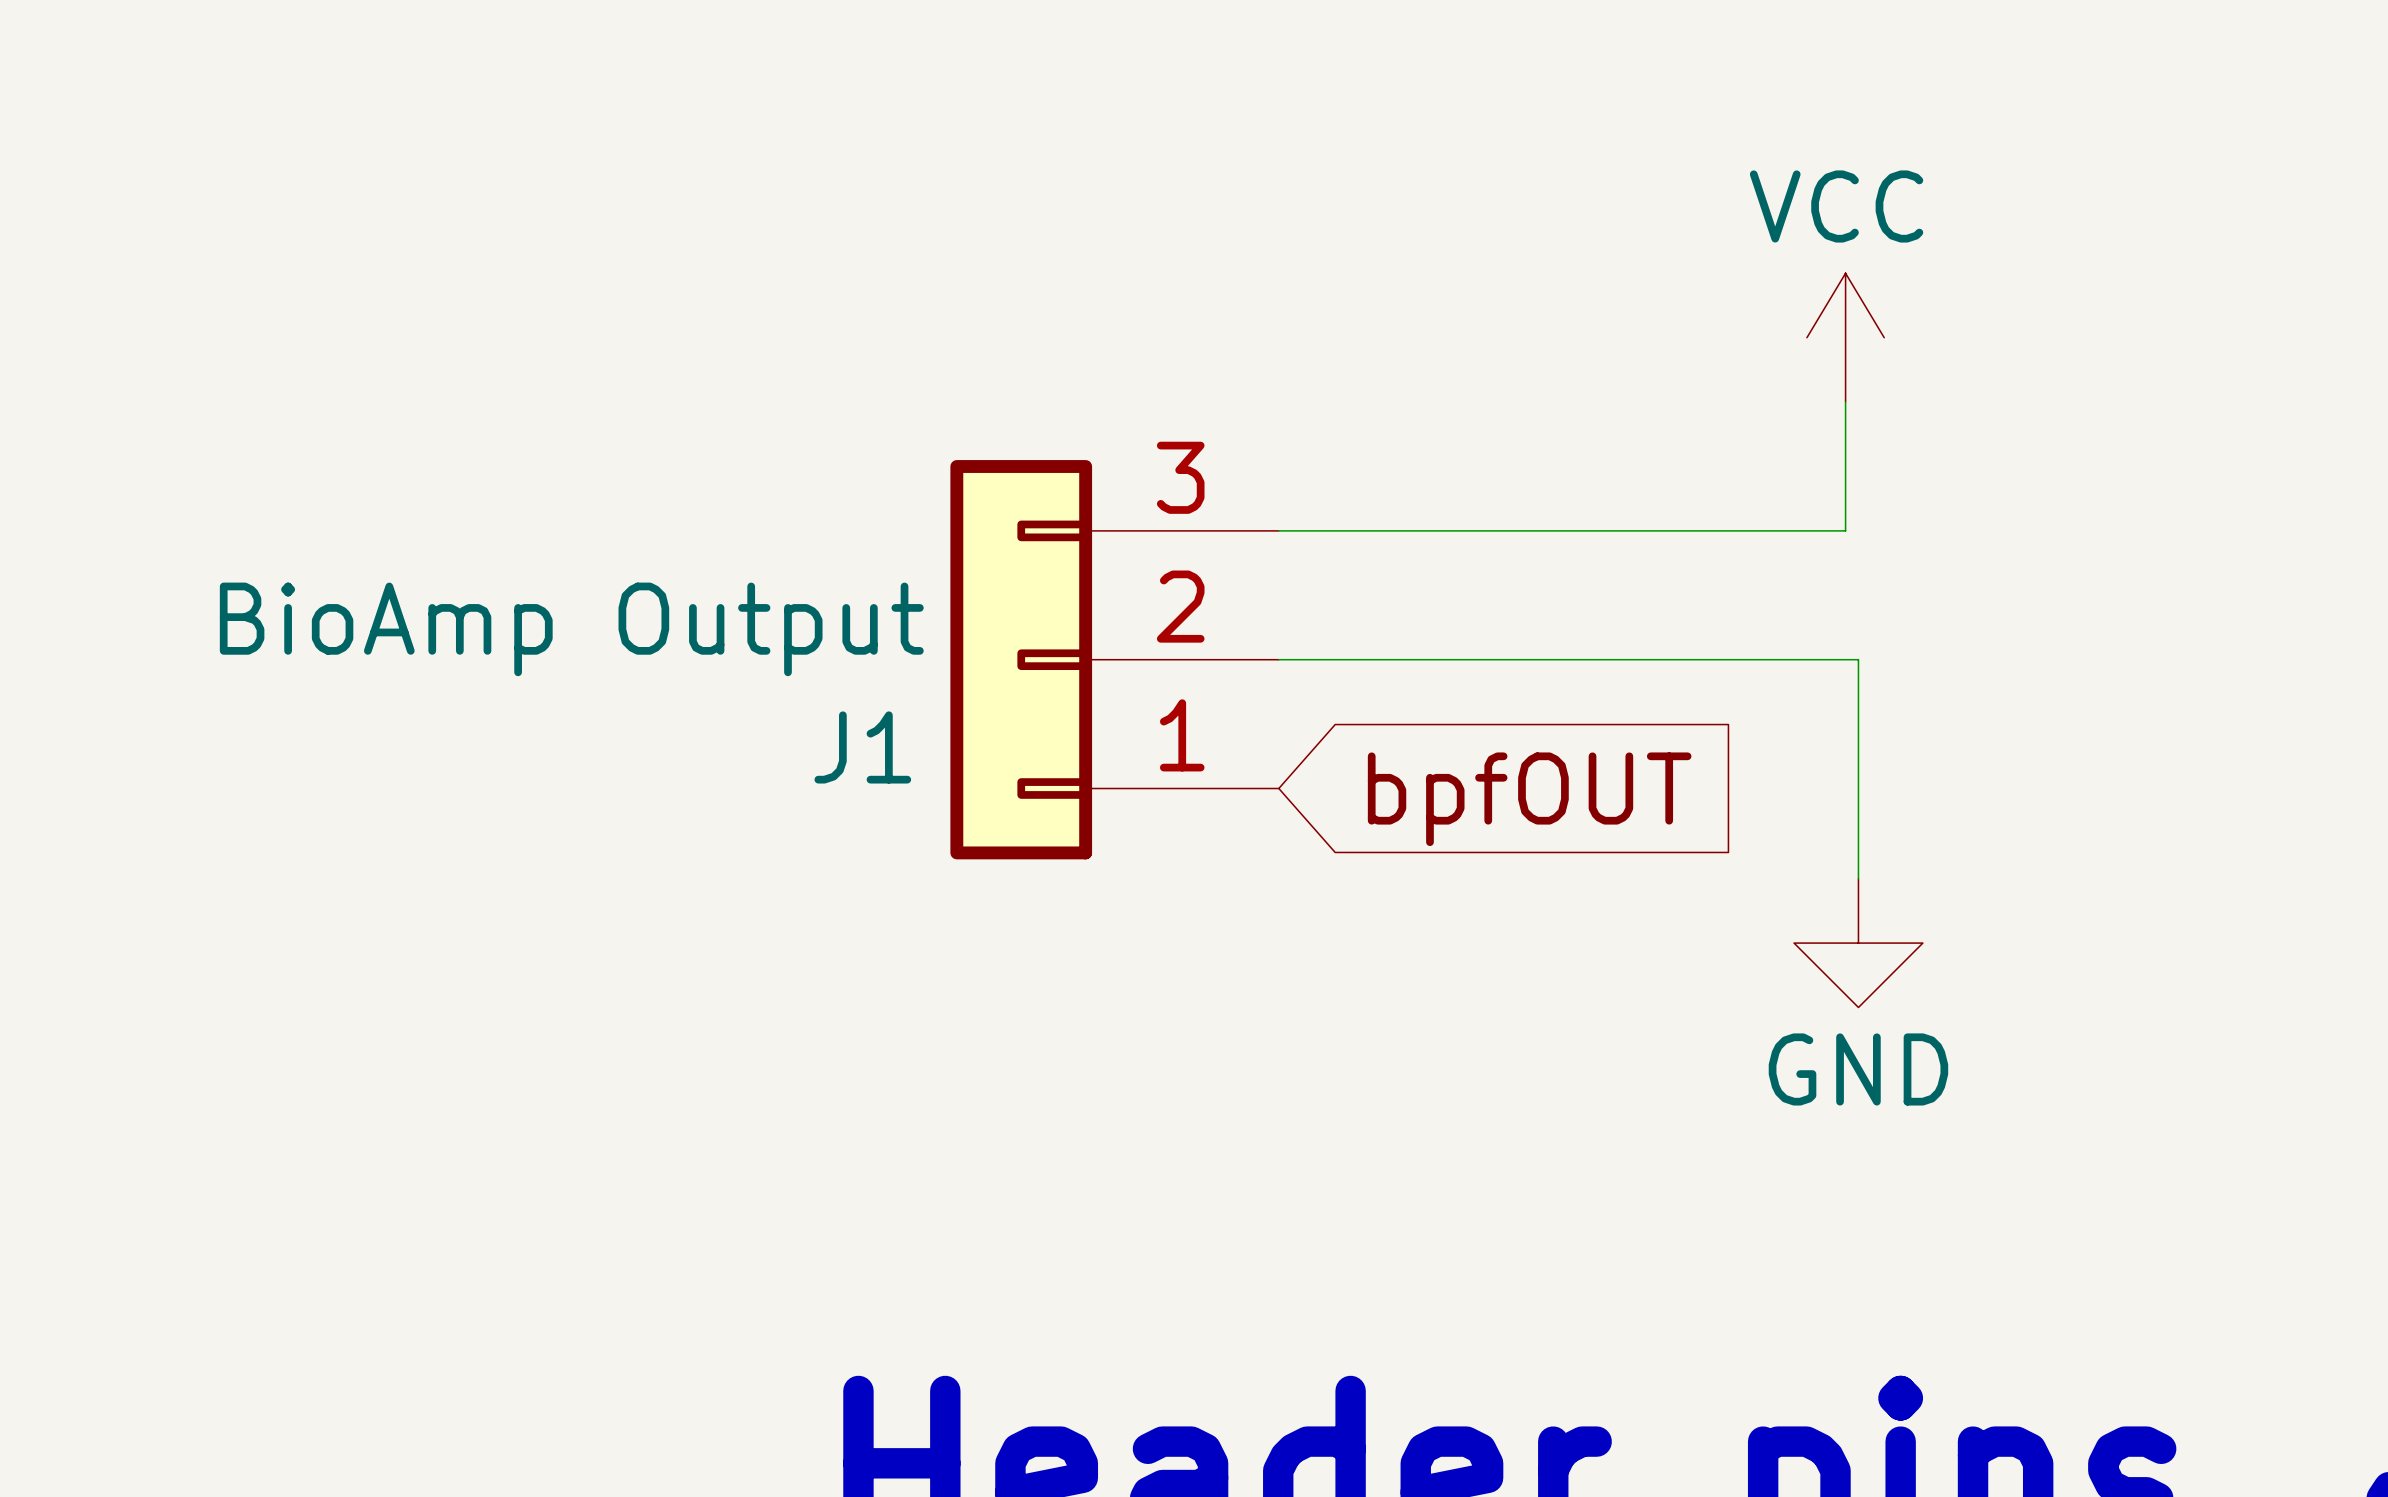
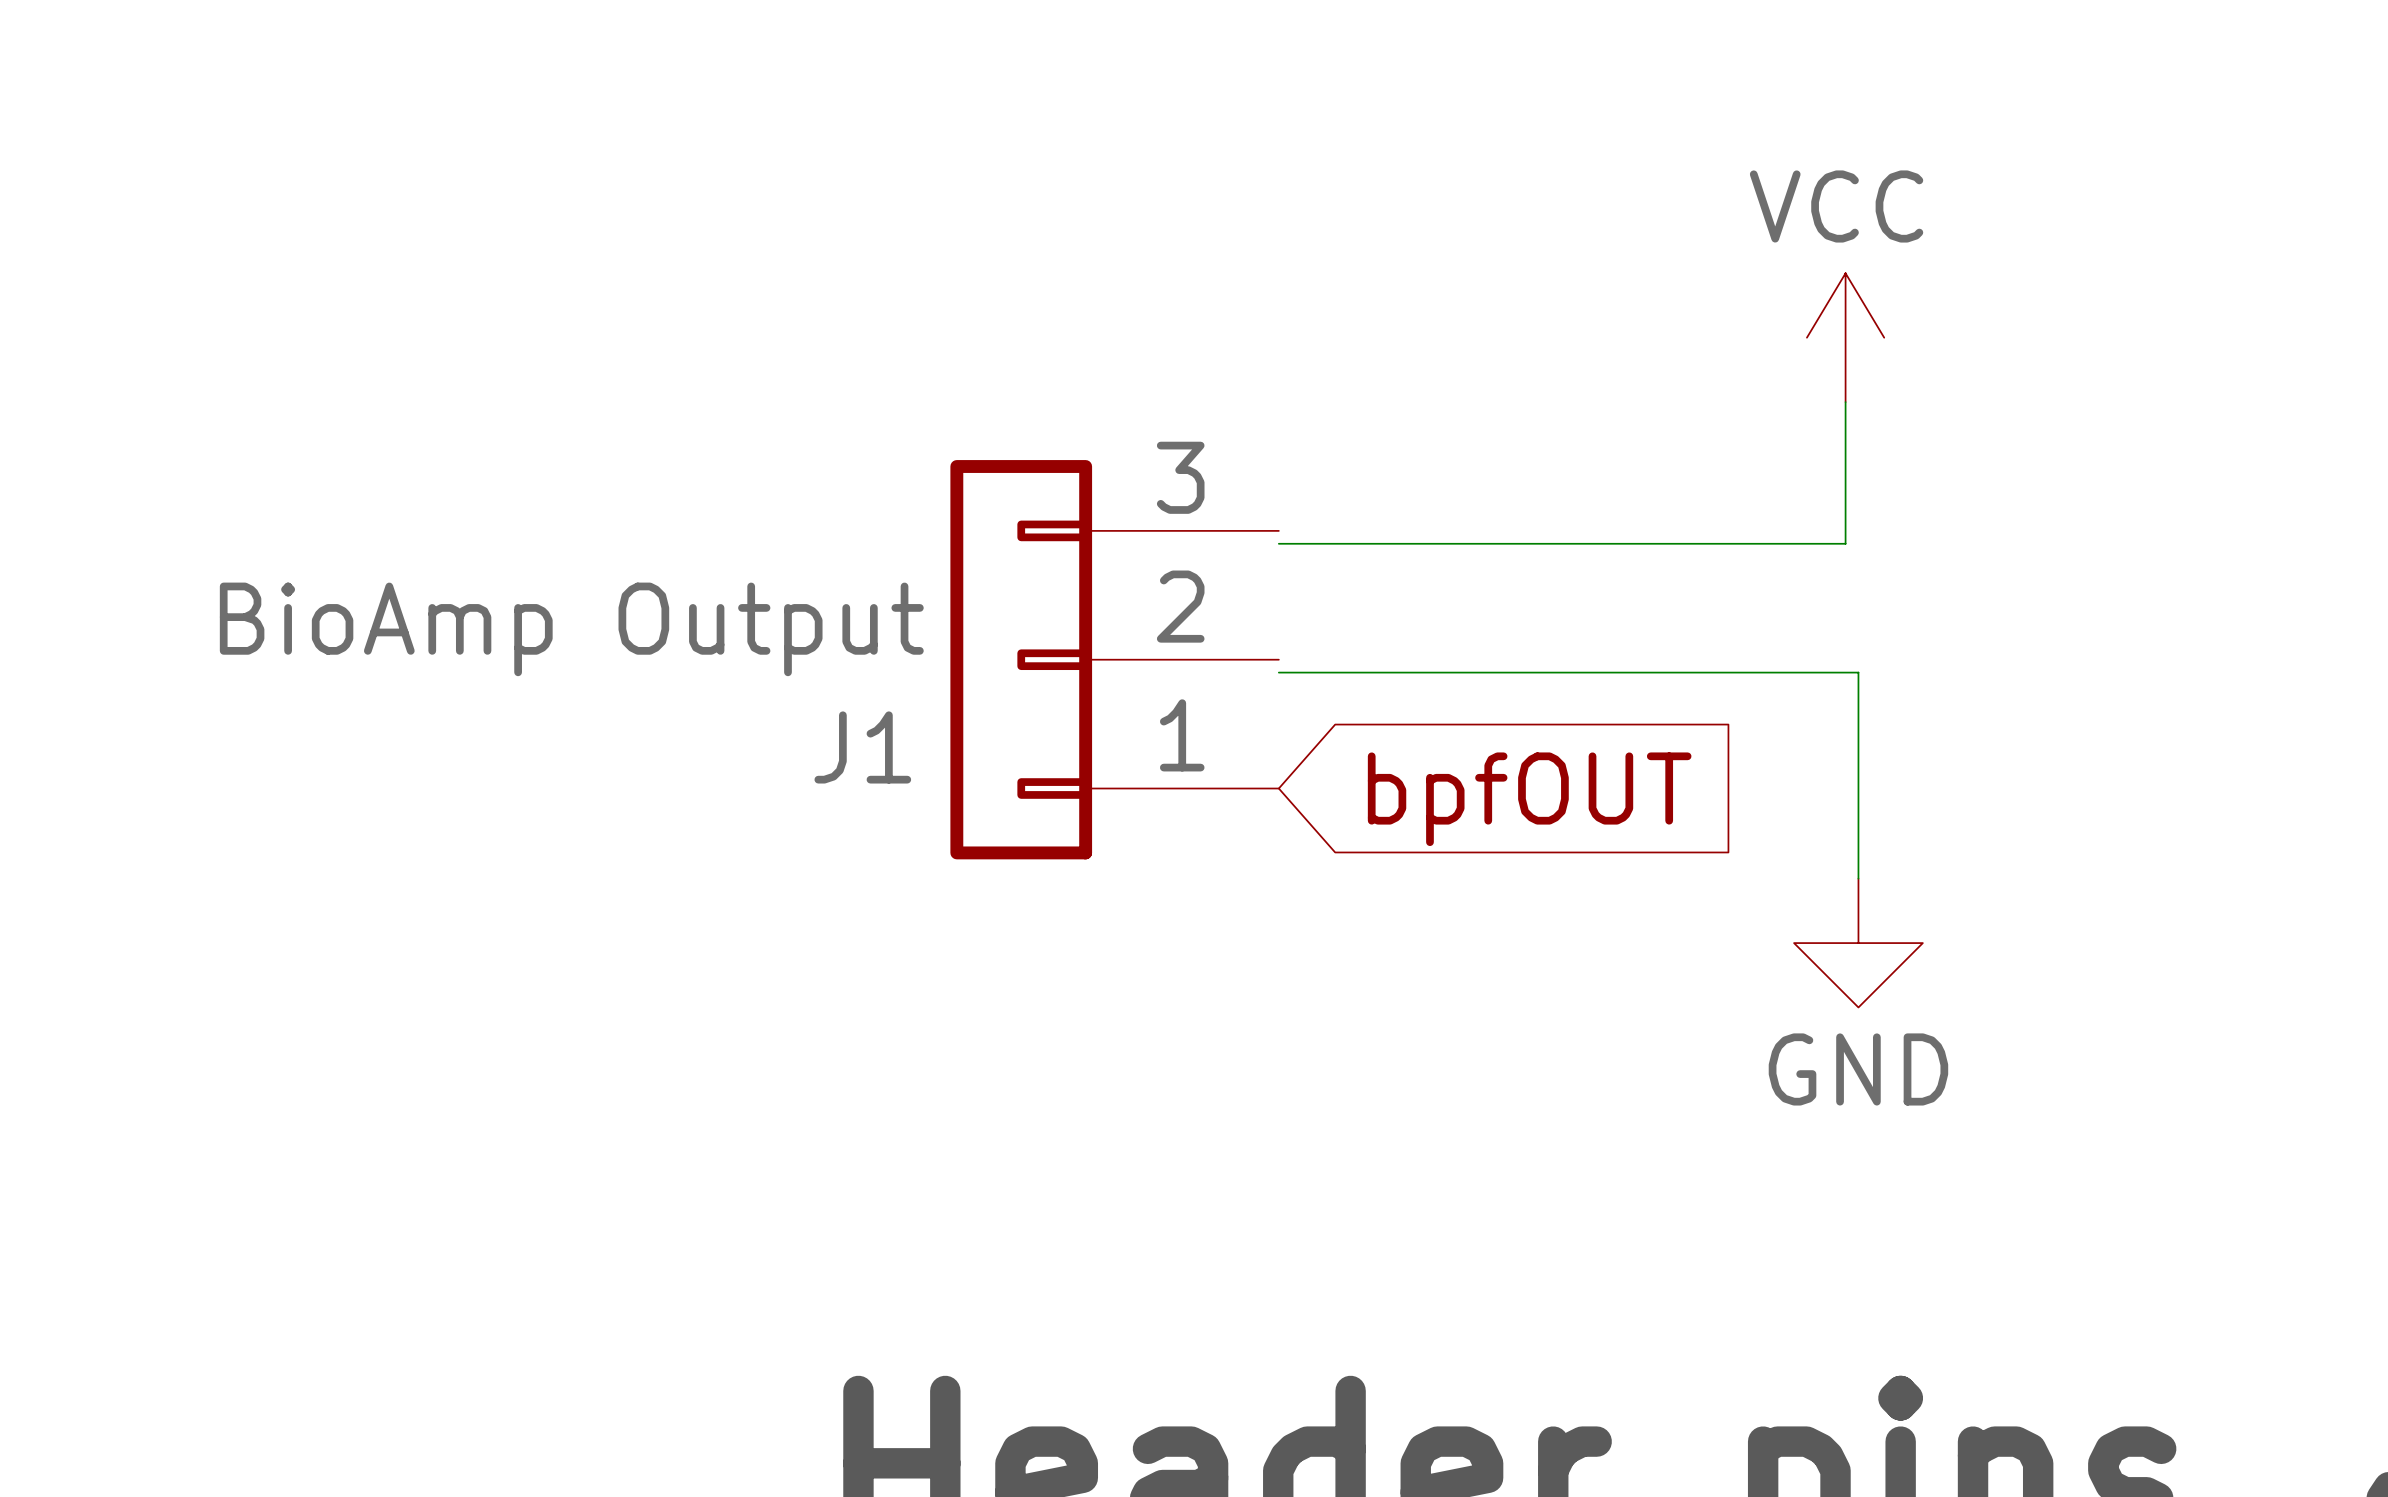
wire: (1278, 530) (1845, 530) -> (1278, 543) (1845, 543) (1845, 530)
wire: (1278, 659) (1858, 659) (1858, 672) -> (1278, 672) (1858, 672)

